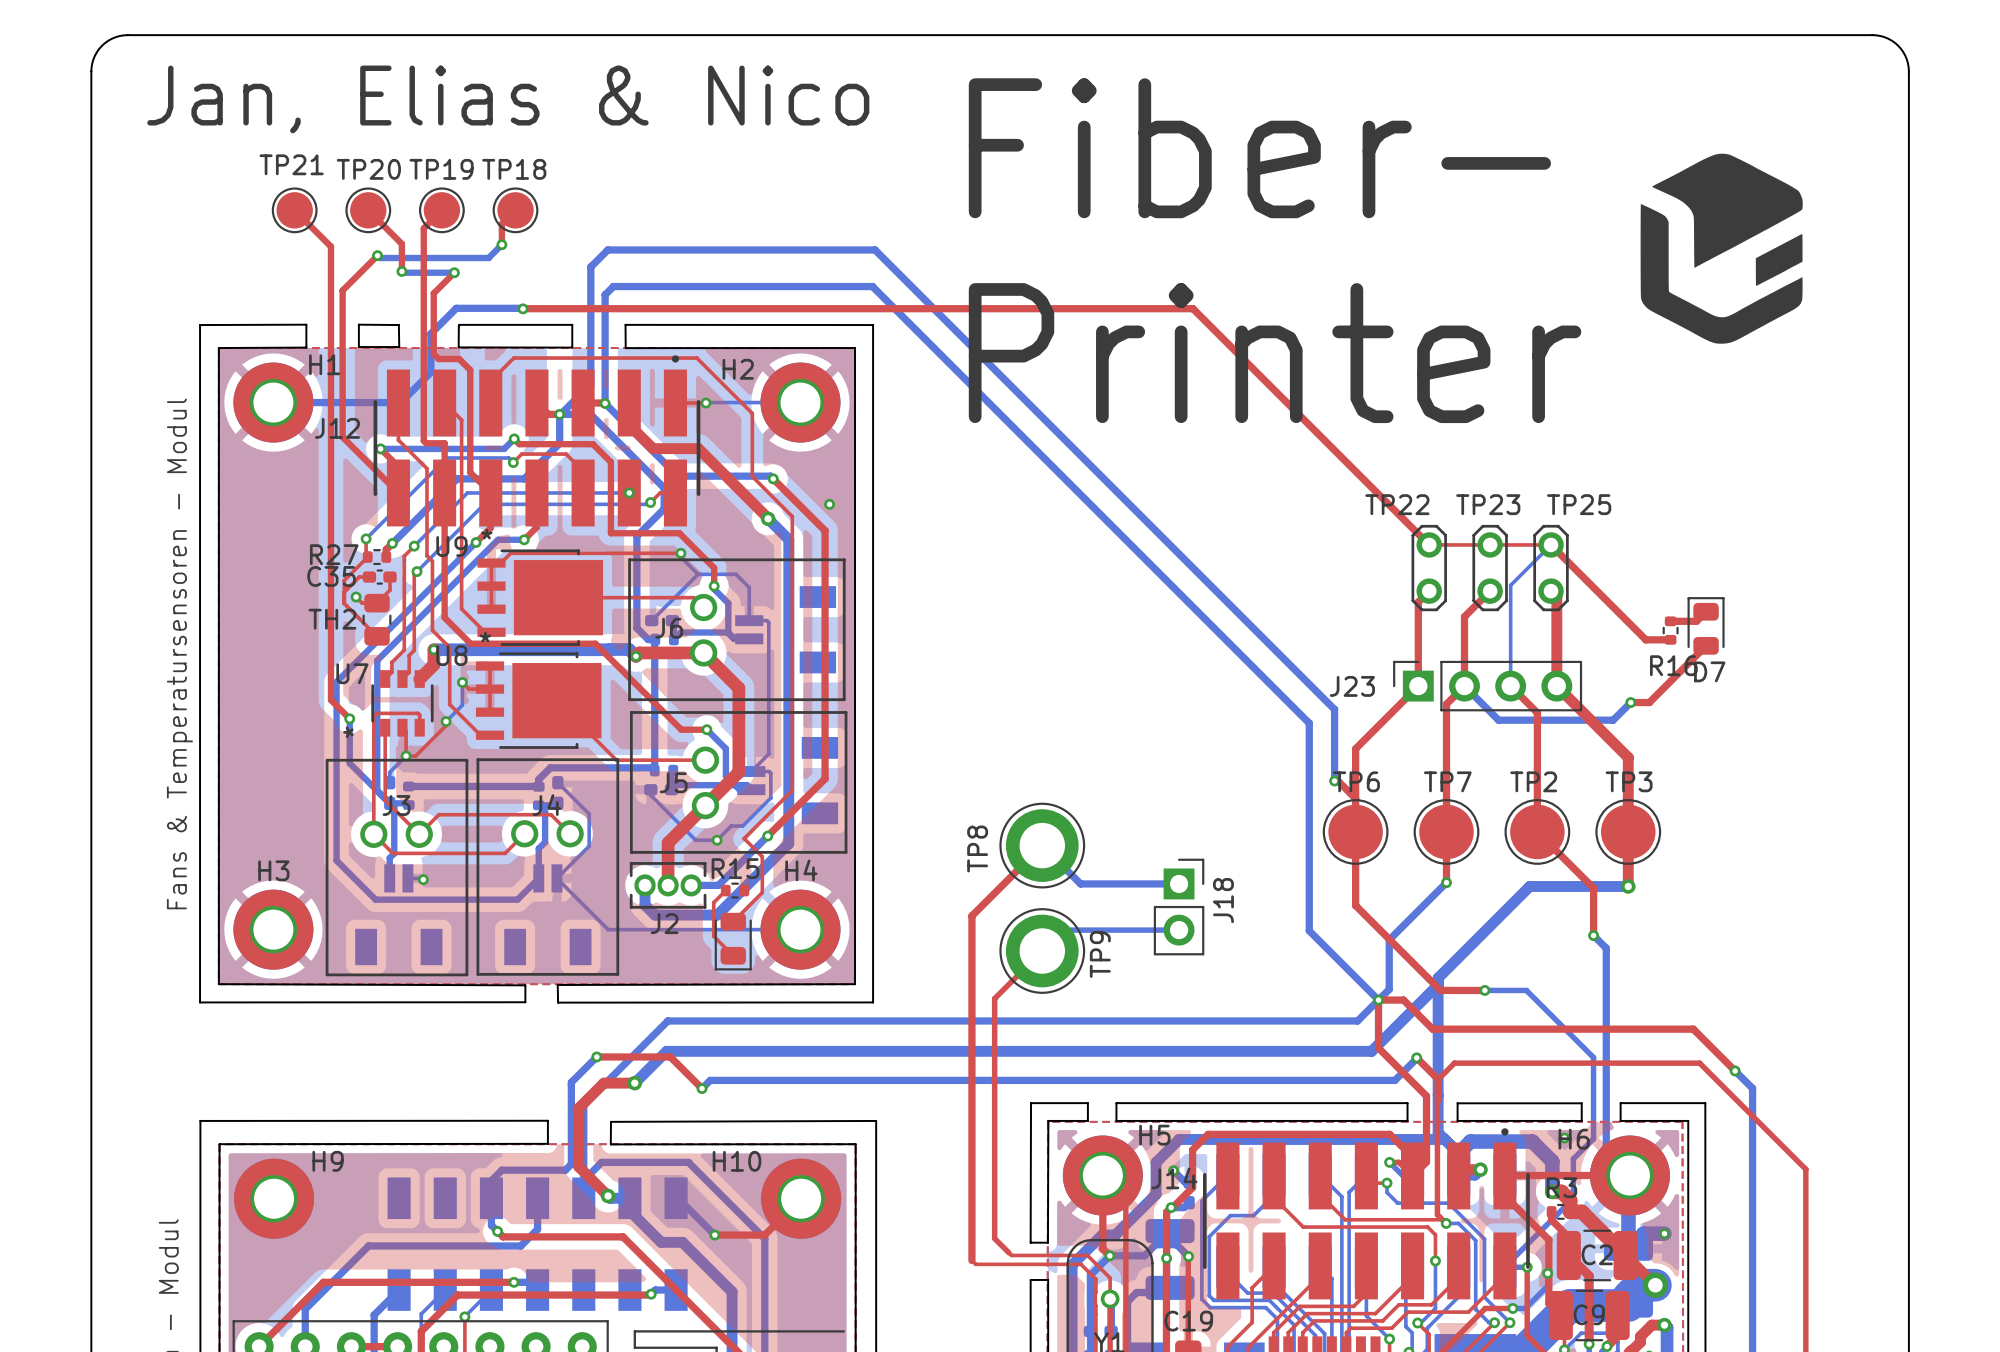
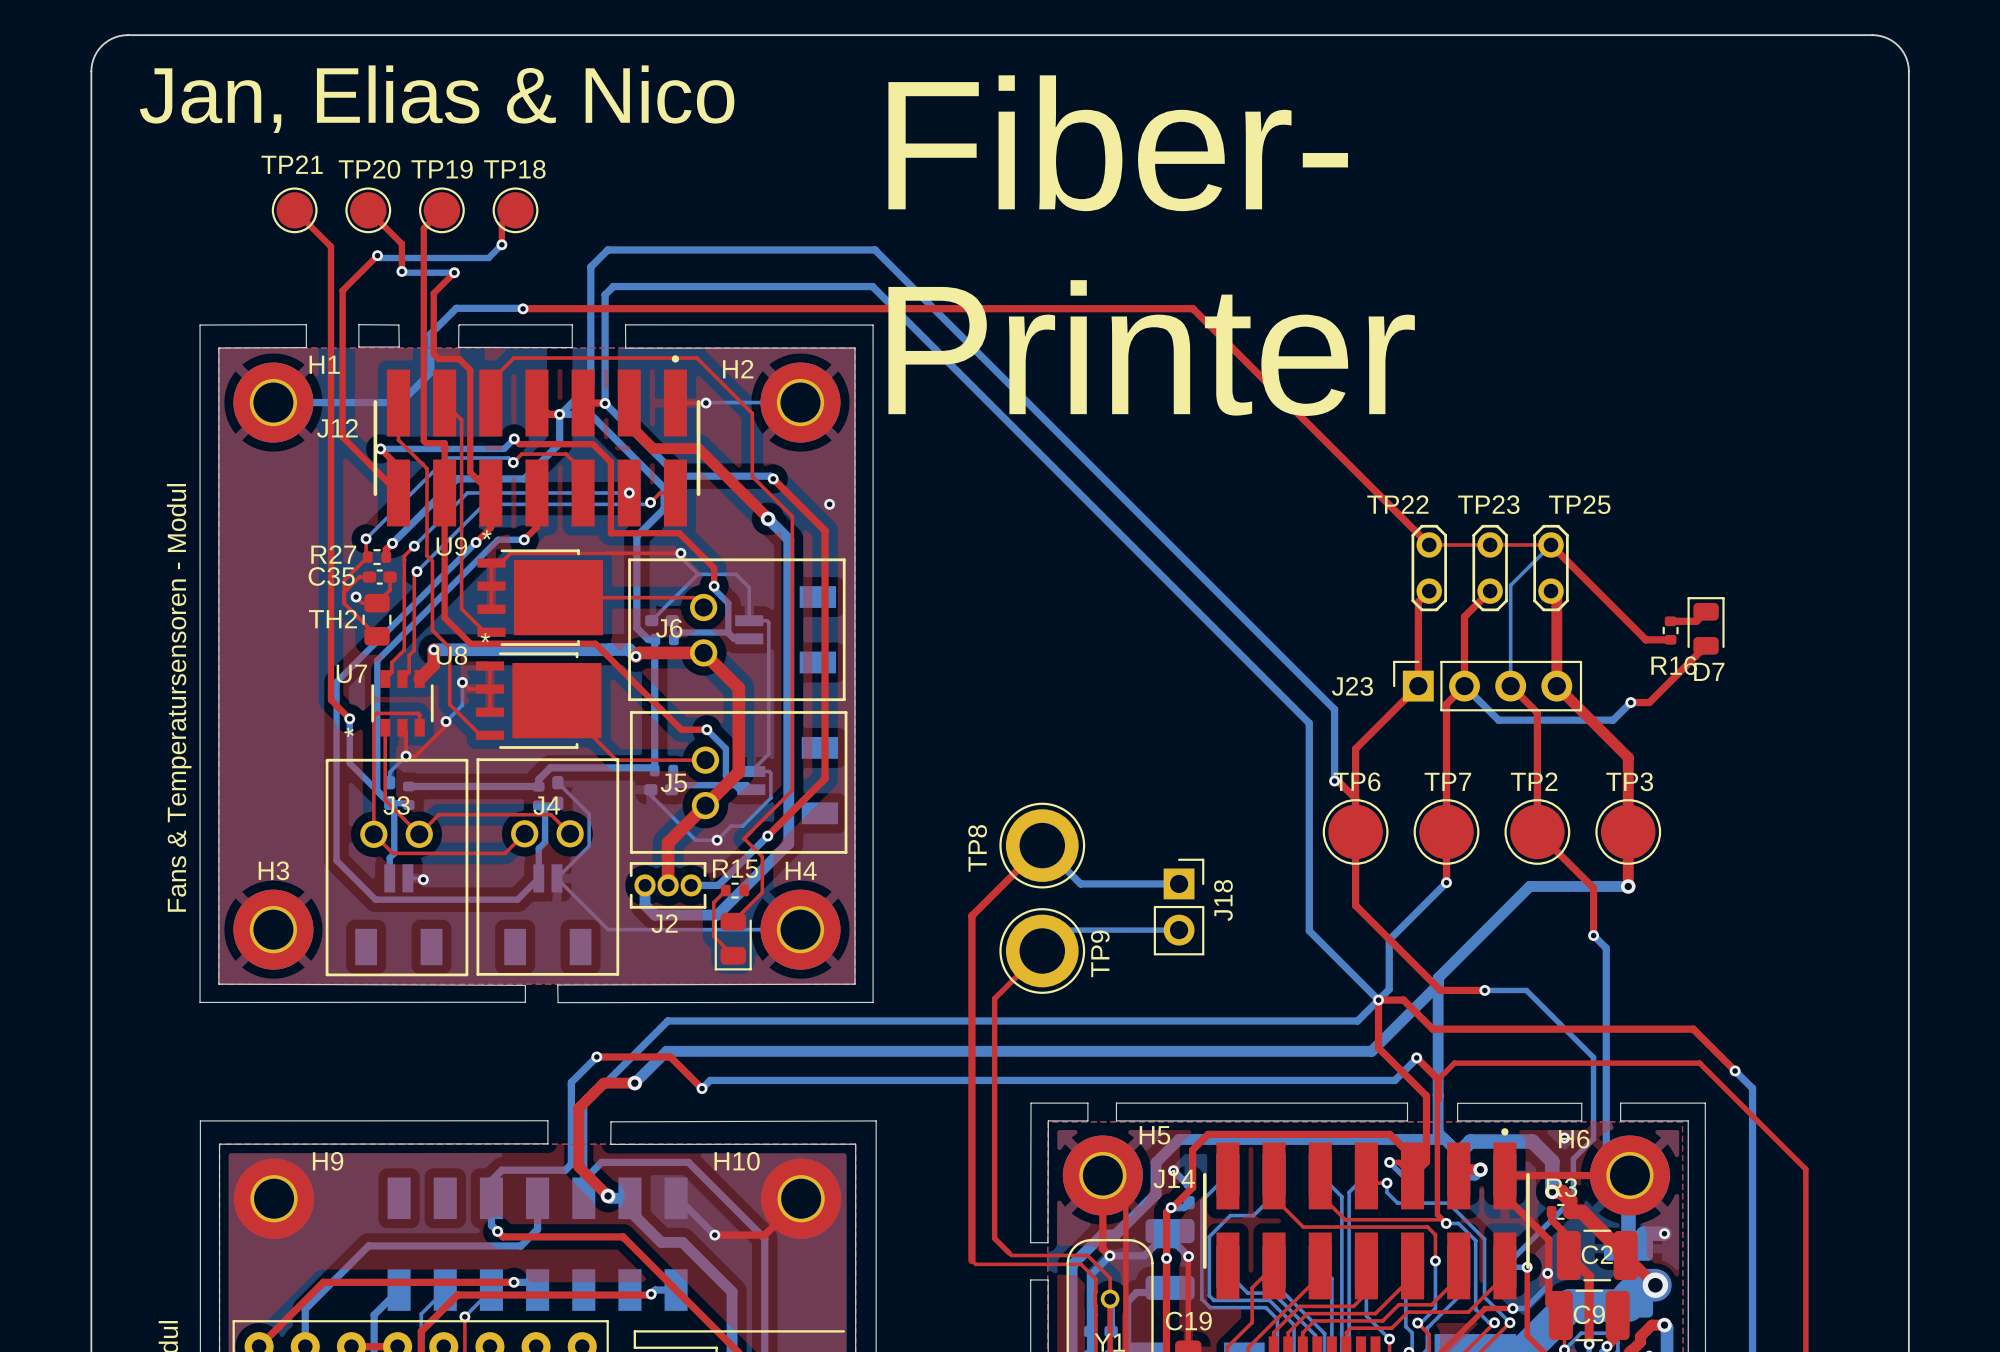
text position: Fiber- (1259, 148) -> Fiber- (1118, 143)
drawing: [1640, 153, 1803, 344] -> none
text position: Printer (1275, 353) -> Printer (1151, 348)

